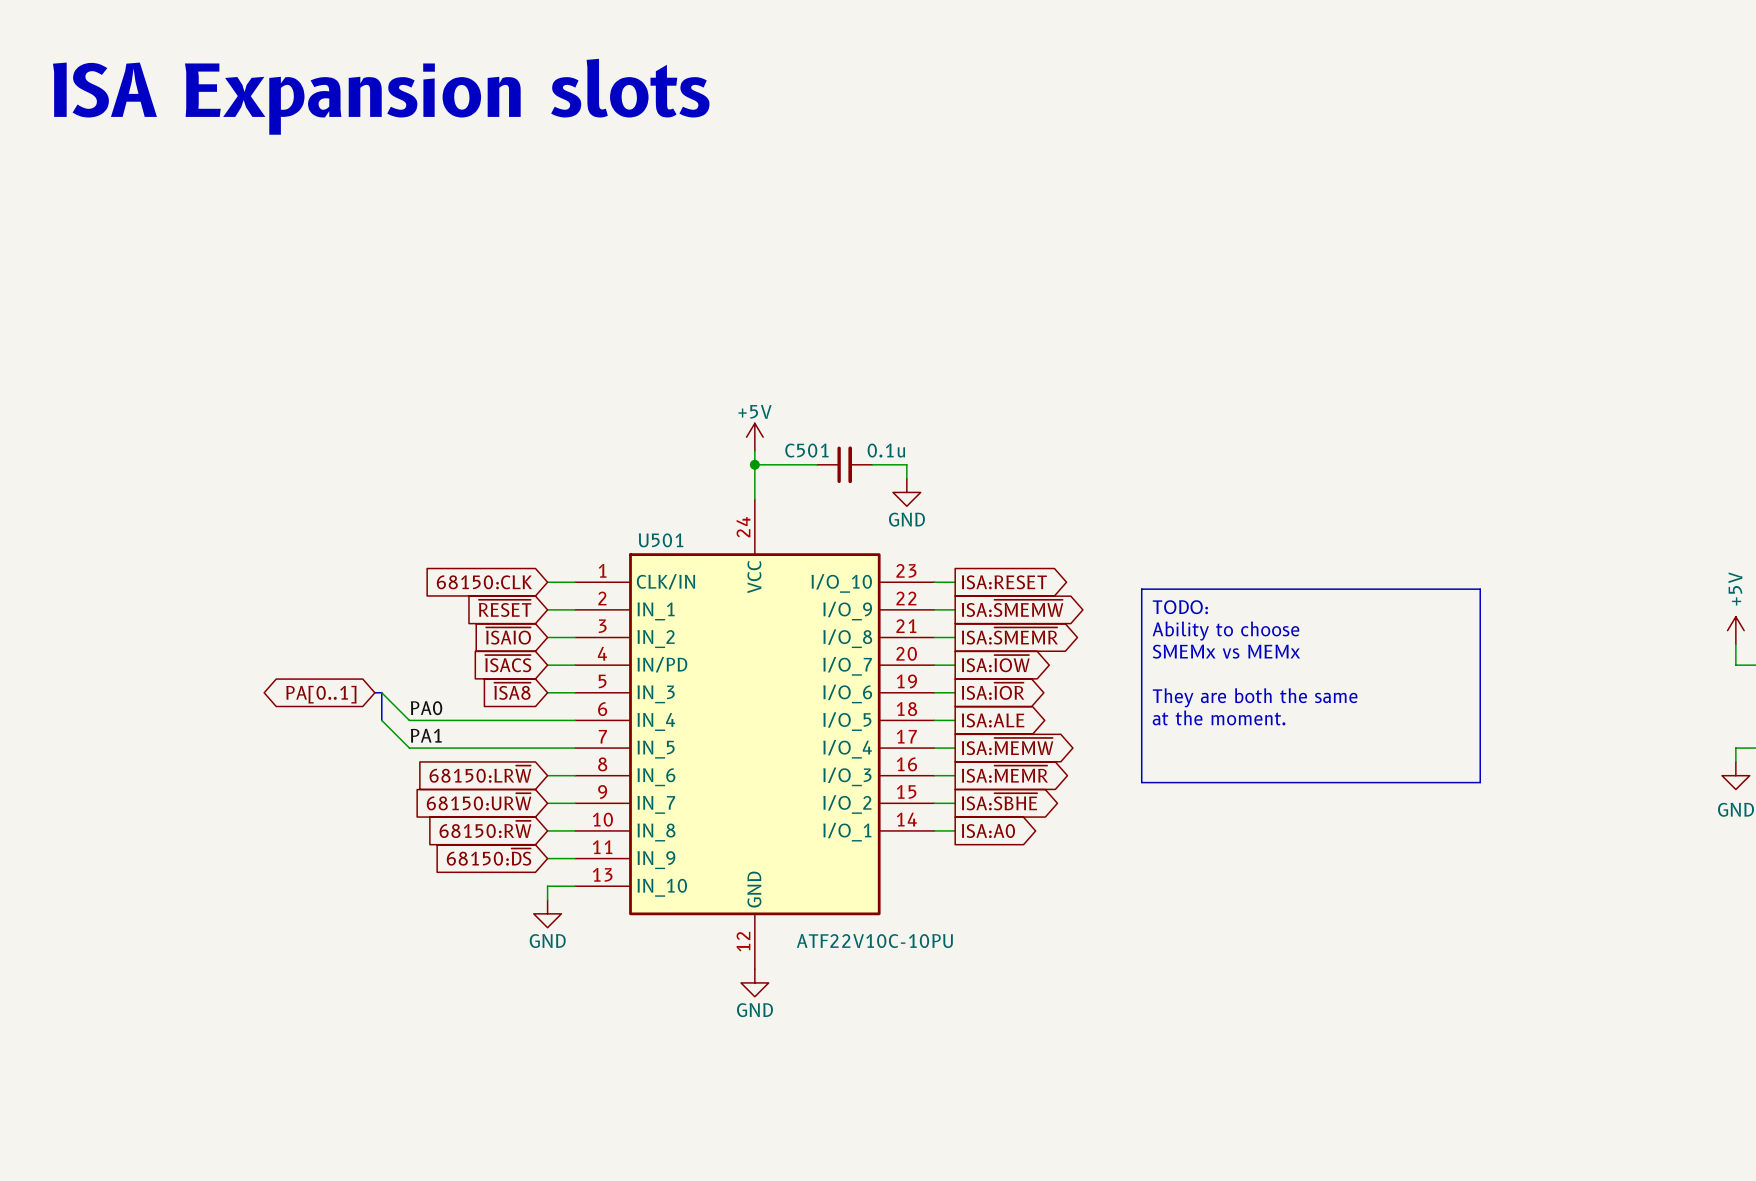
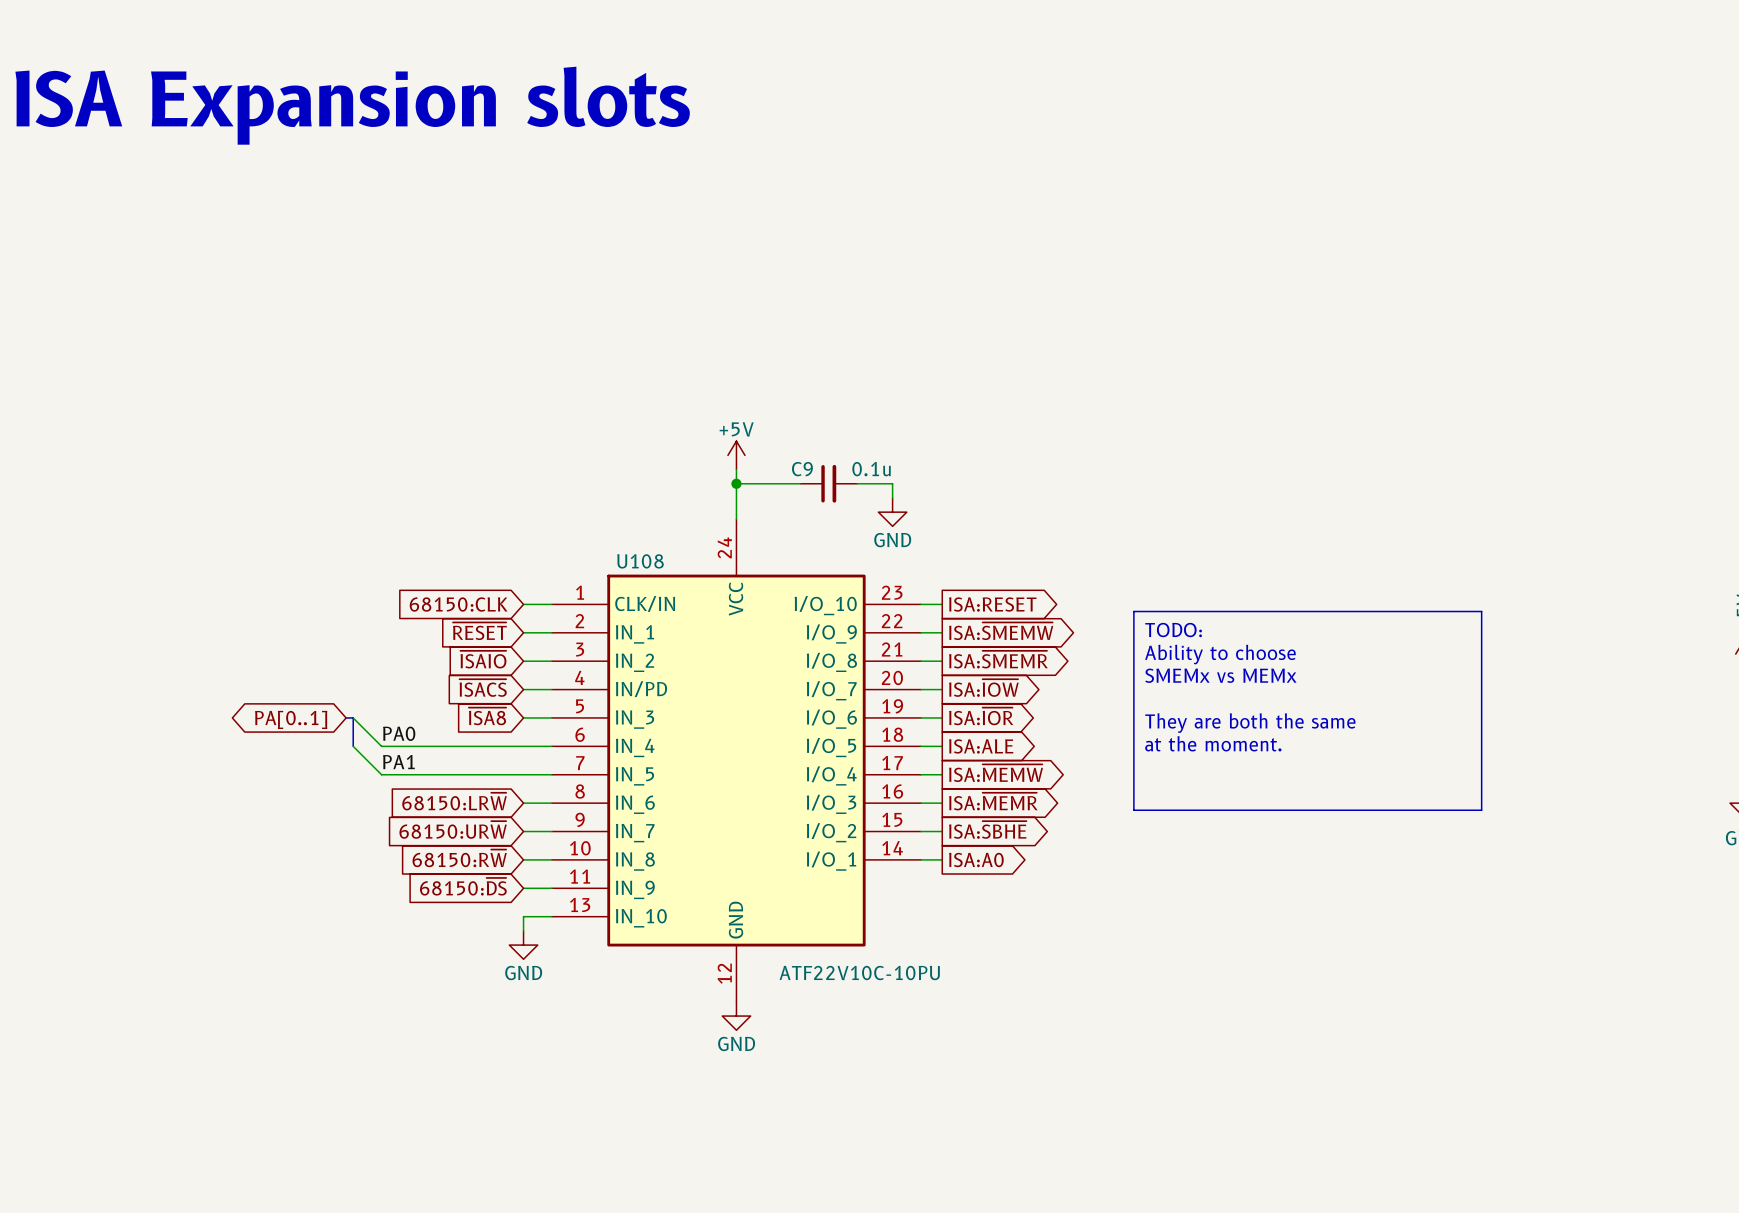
C501 name: C501 (806, 450) -> C9 (802, 469)
U501 name: U501 (661, 540) -> U108 (640, 561)

